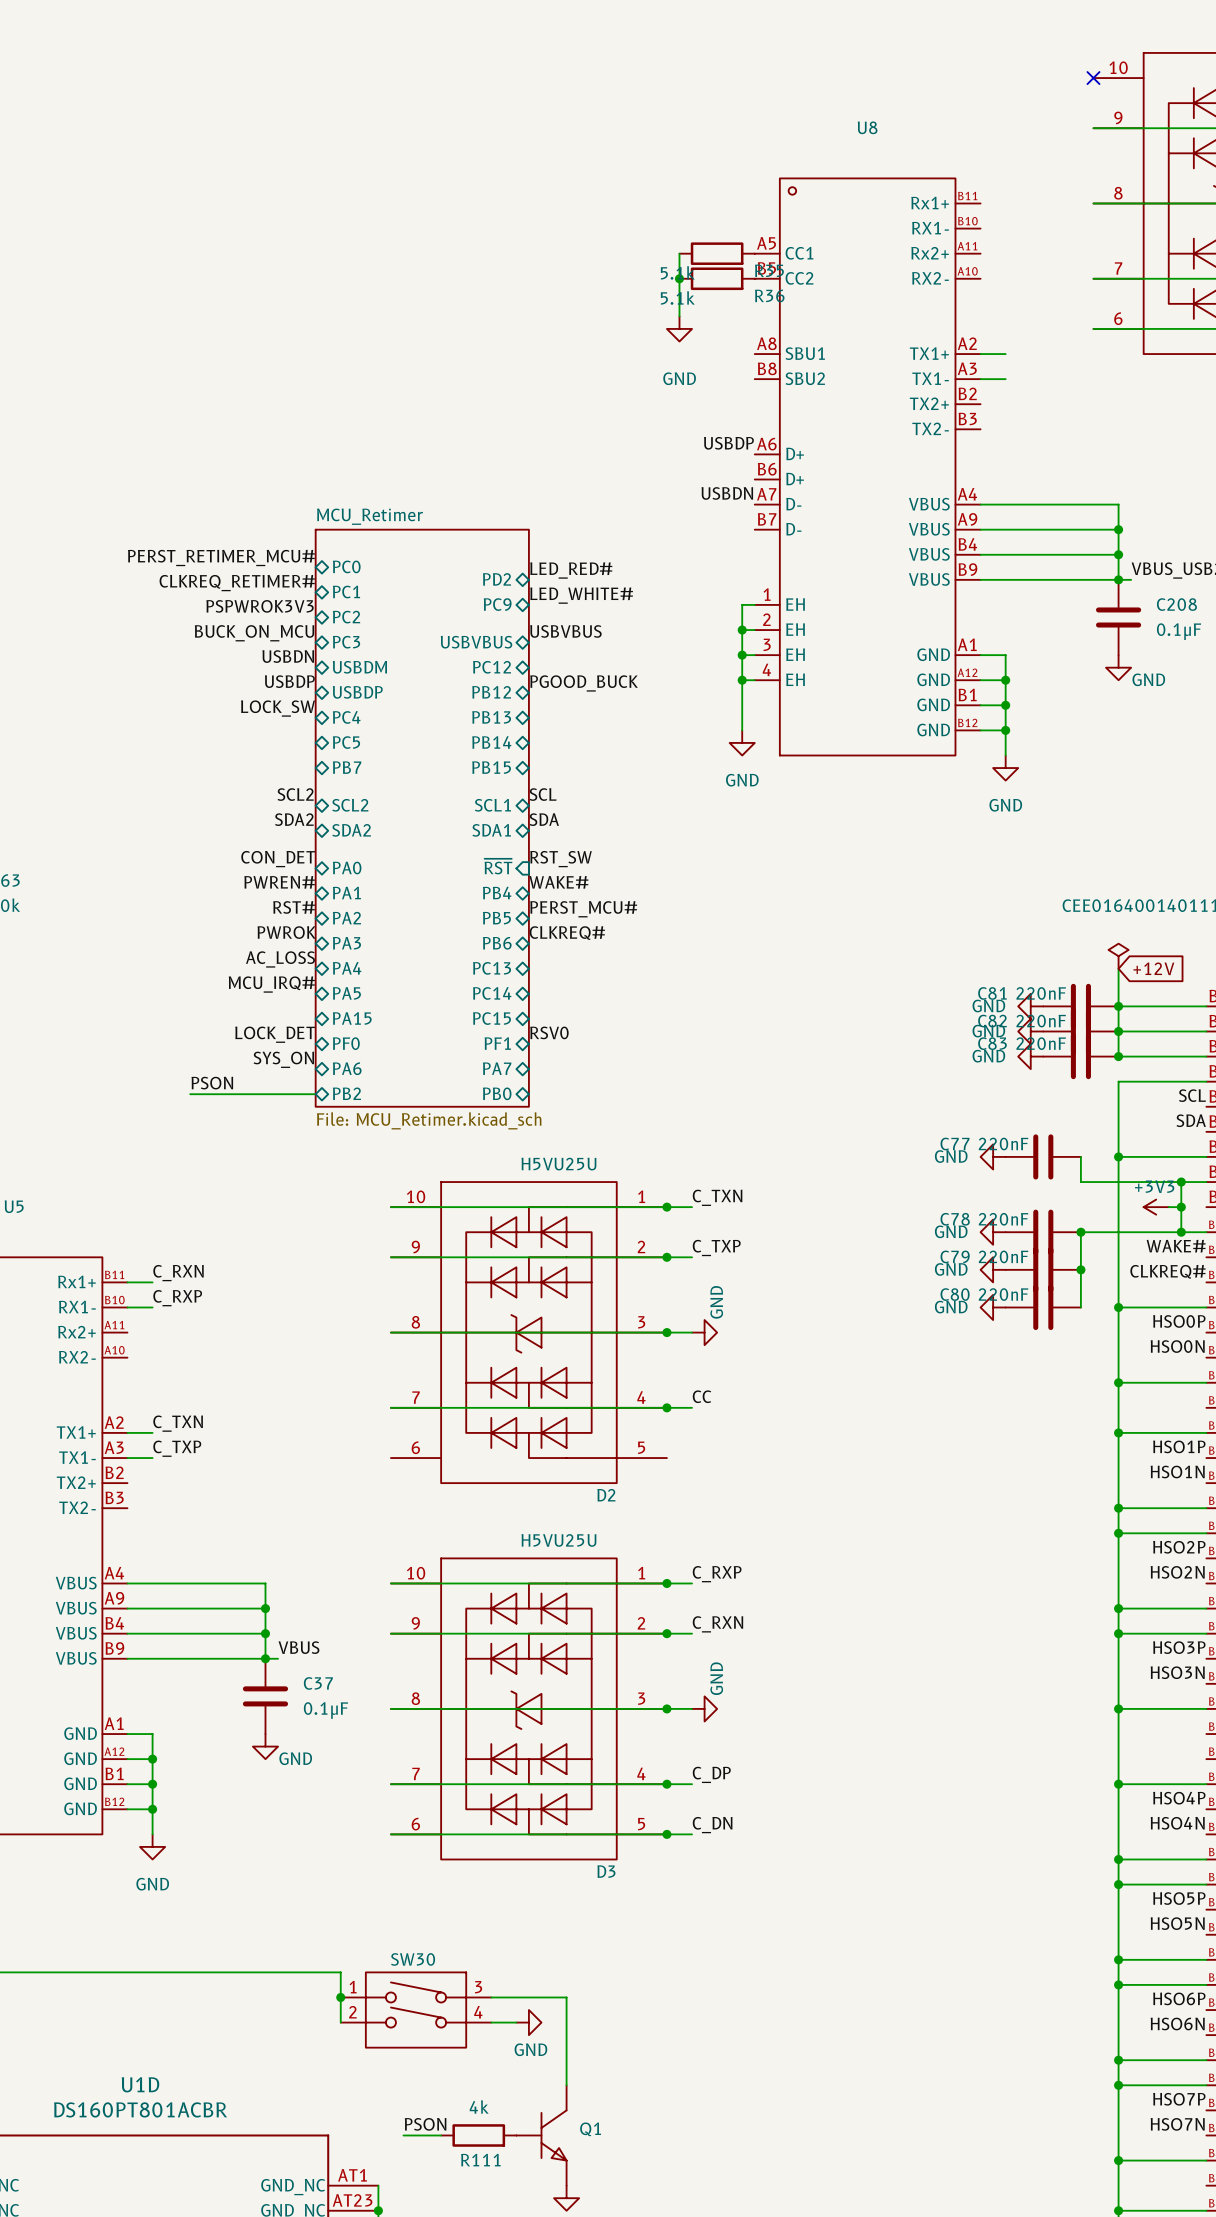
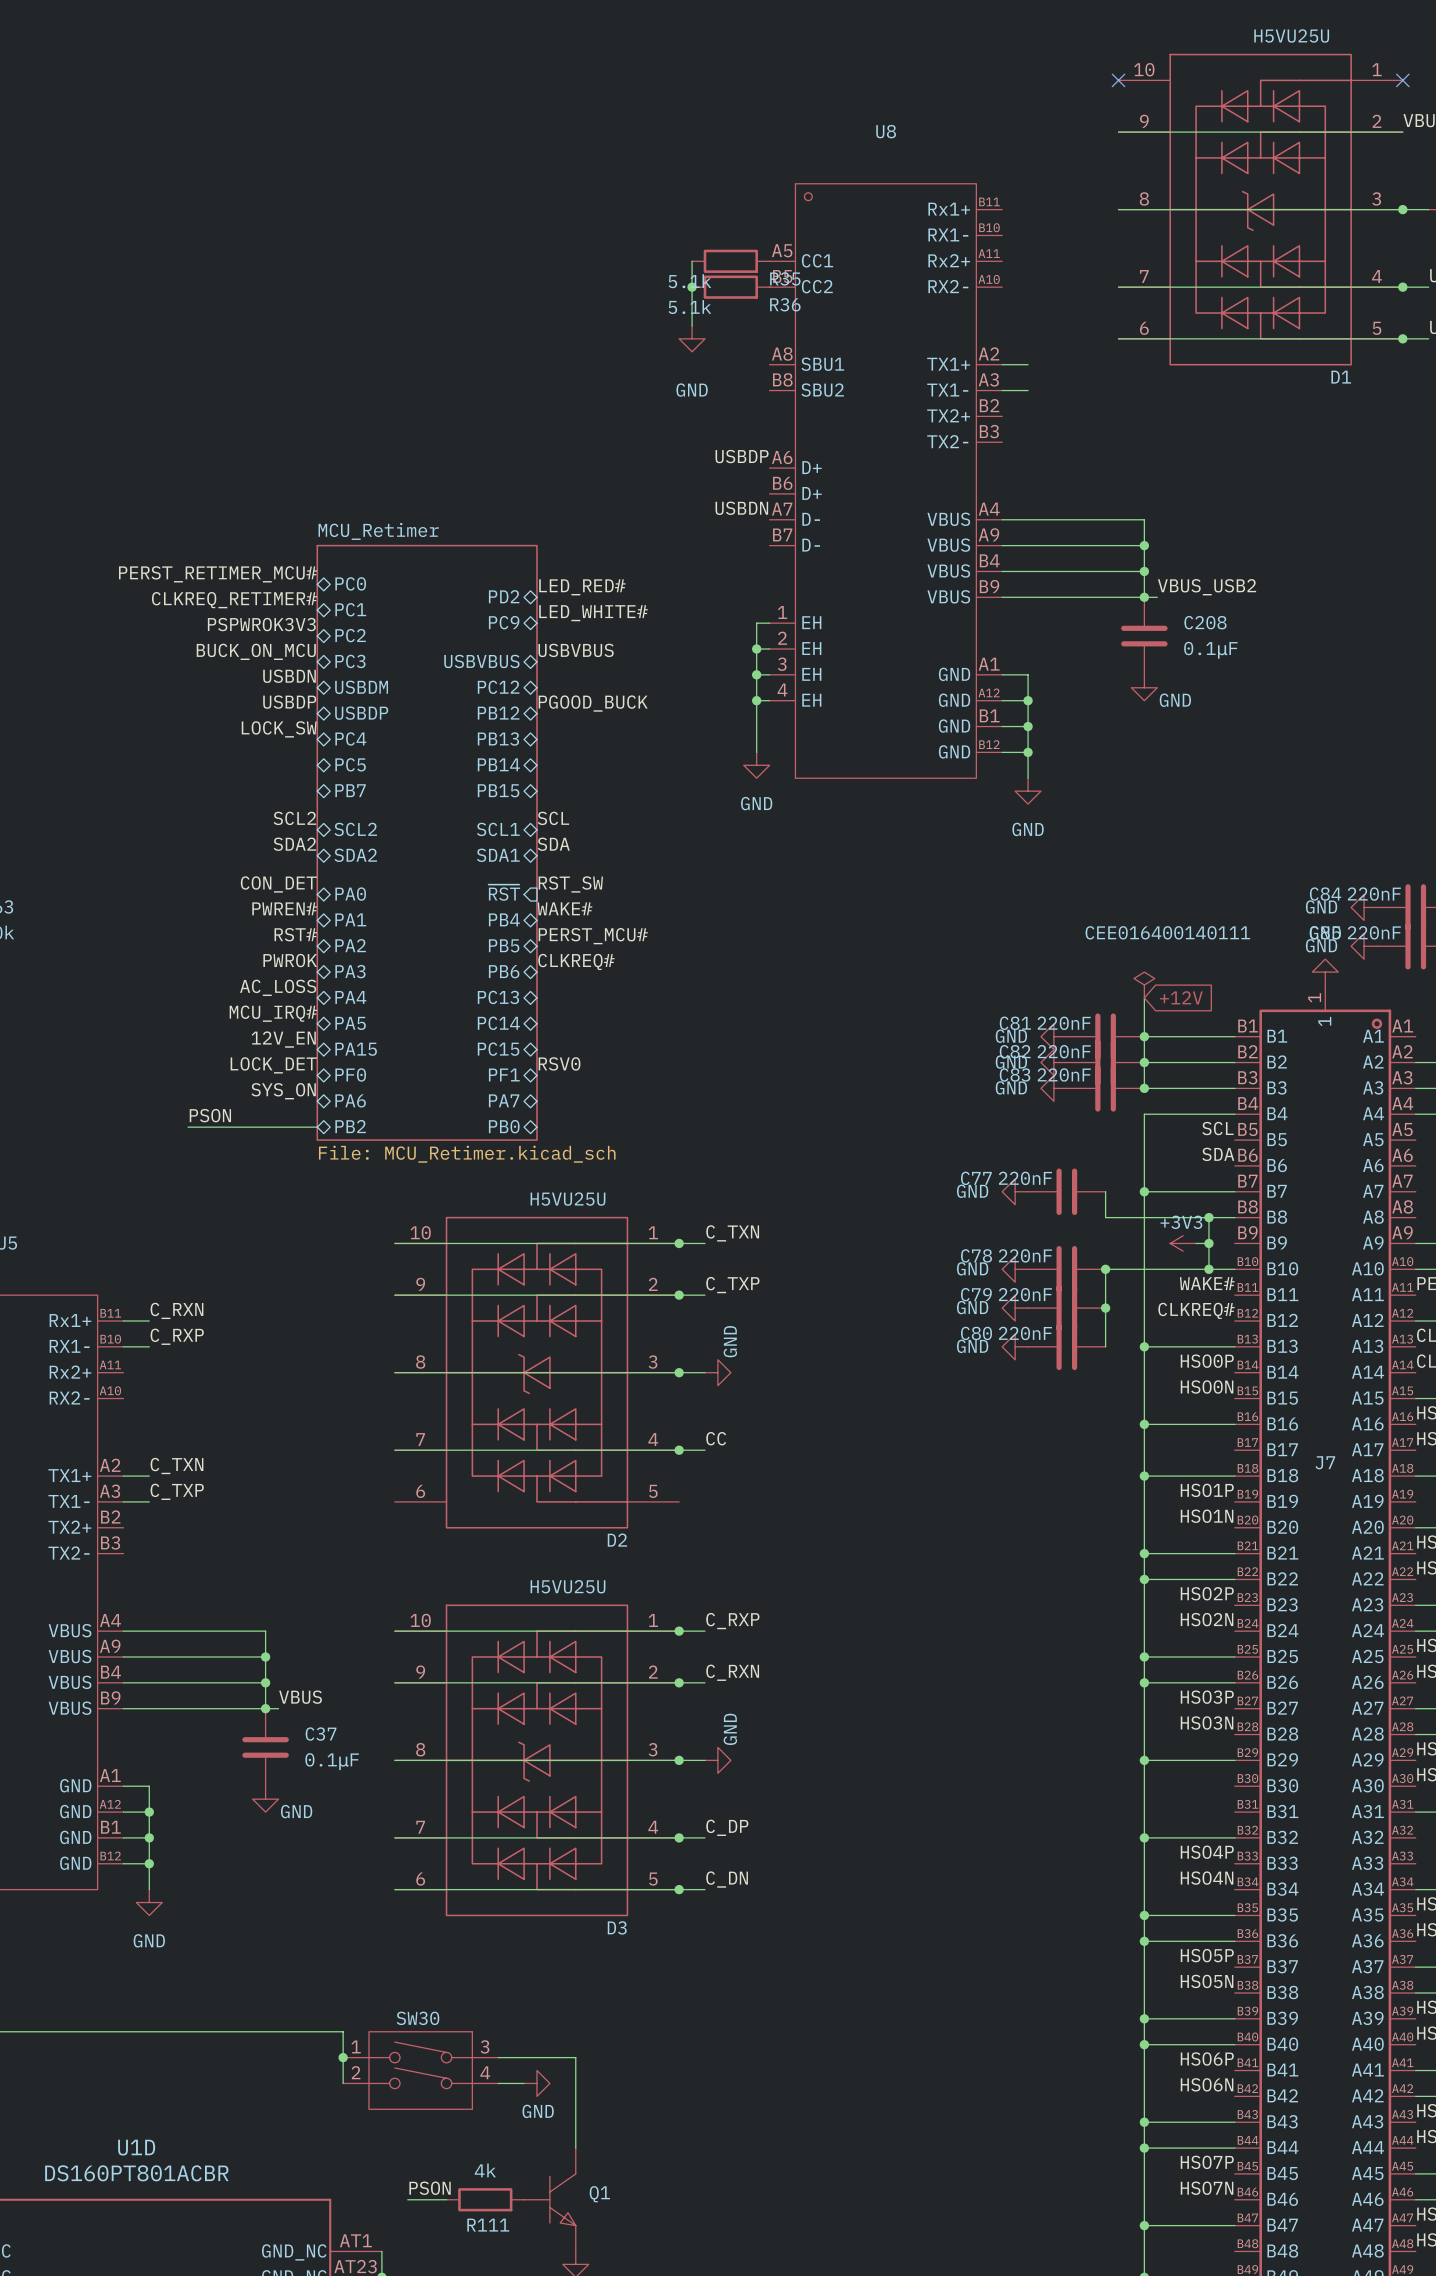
label: none -> 12V_EN (283, 1039)

